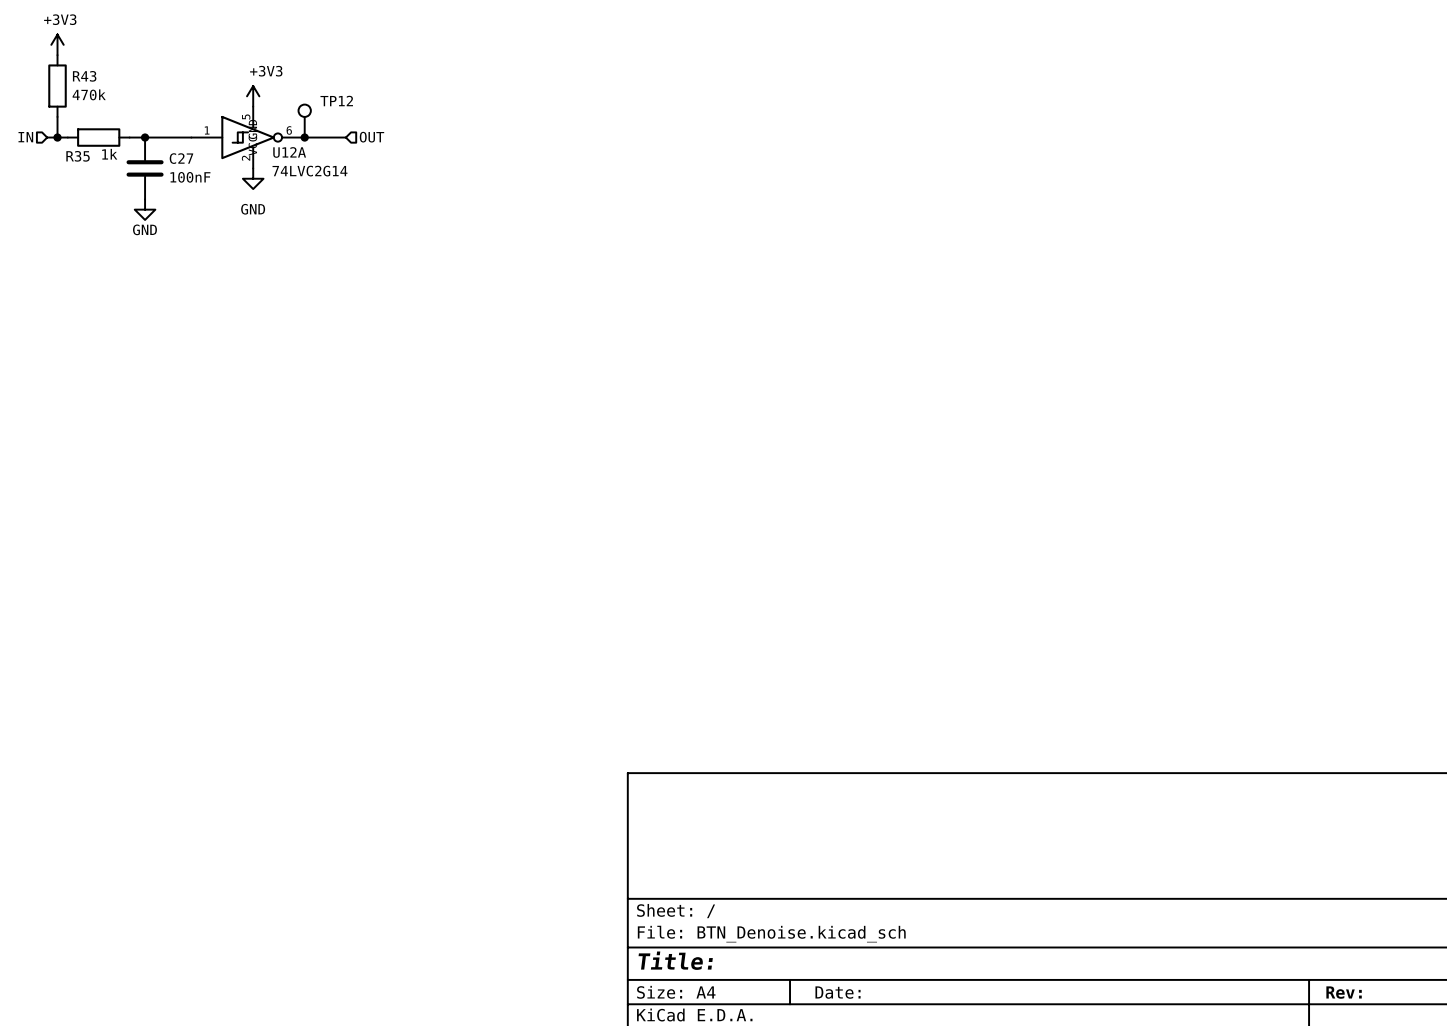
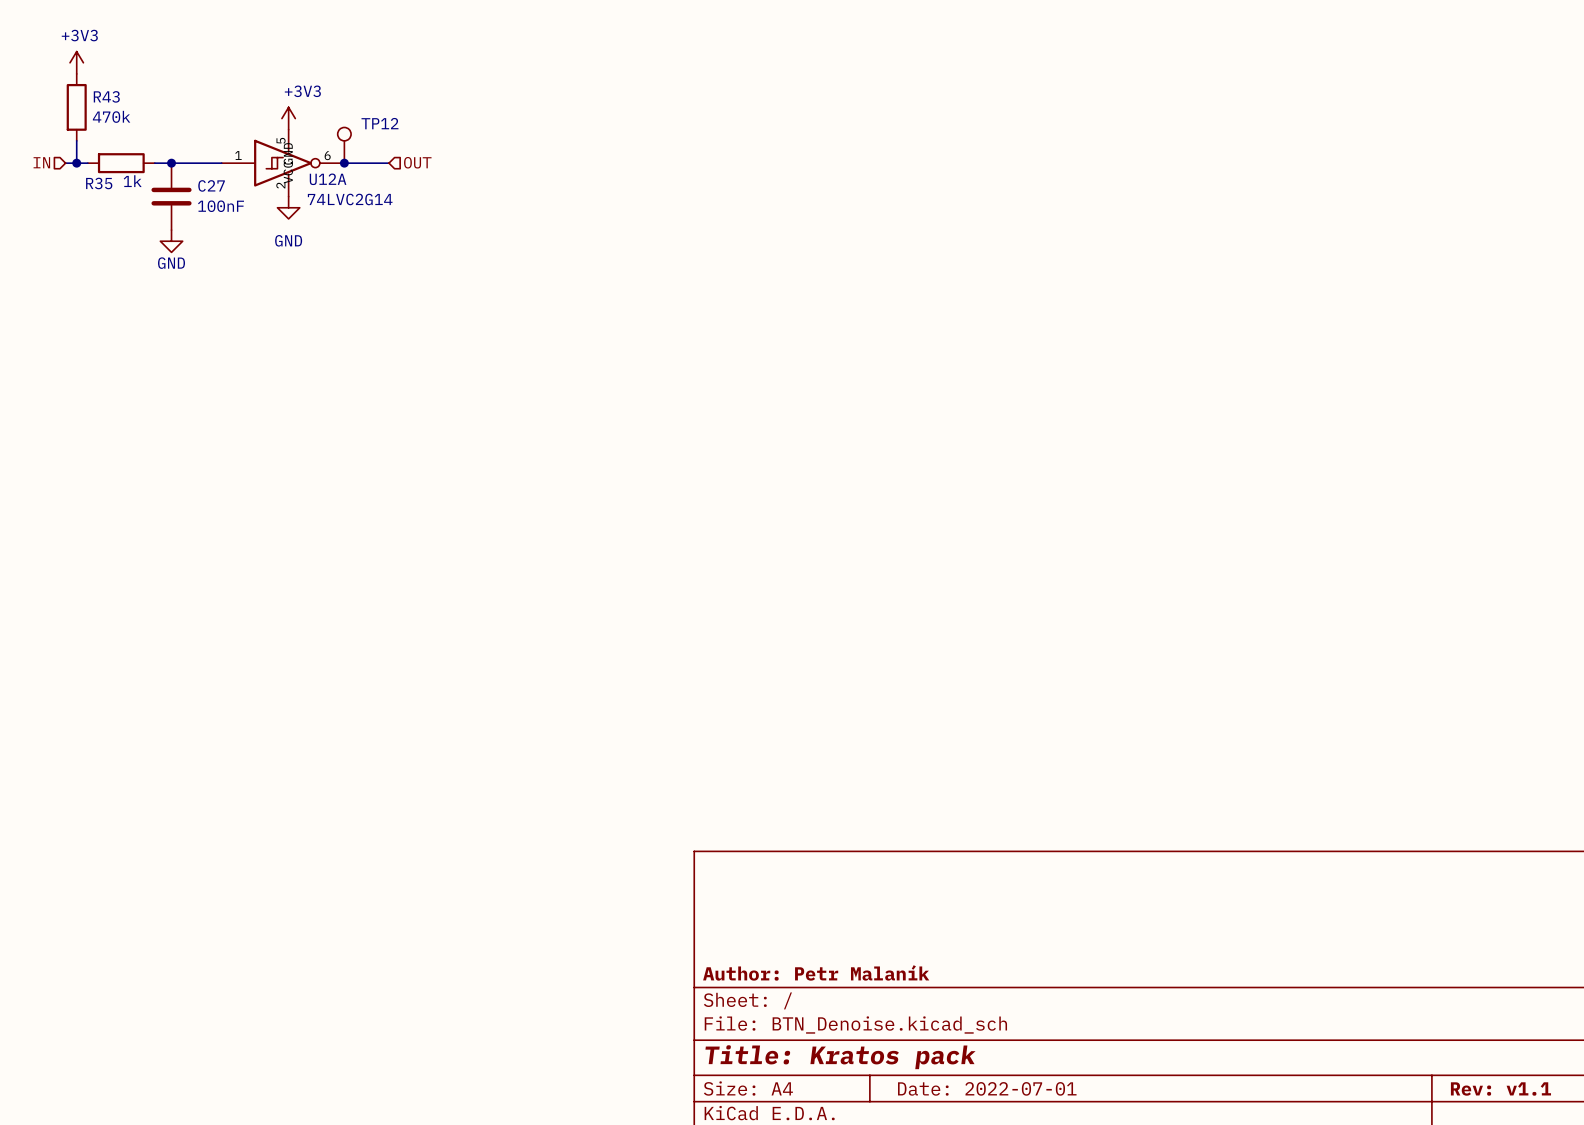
title block: none -> Author: Petr Malaník (816, 972)
title block: Title: (675, 960) -> Title: Kratos pack (840, 1057)
title block: Date: (838, 992) -> Date: 2022-07-01 (987, 1088)
title block: Rev: (1344, 992) -> Rev: v1.1 (1500, 1088)

